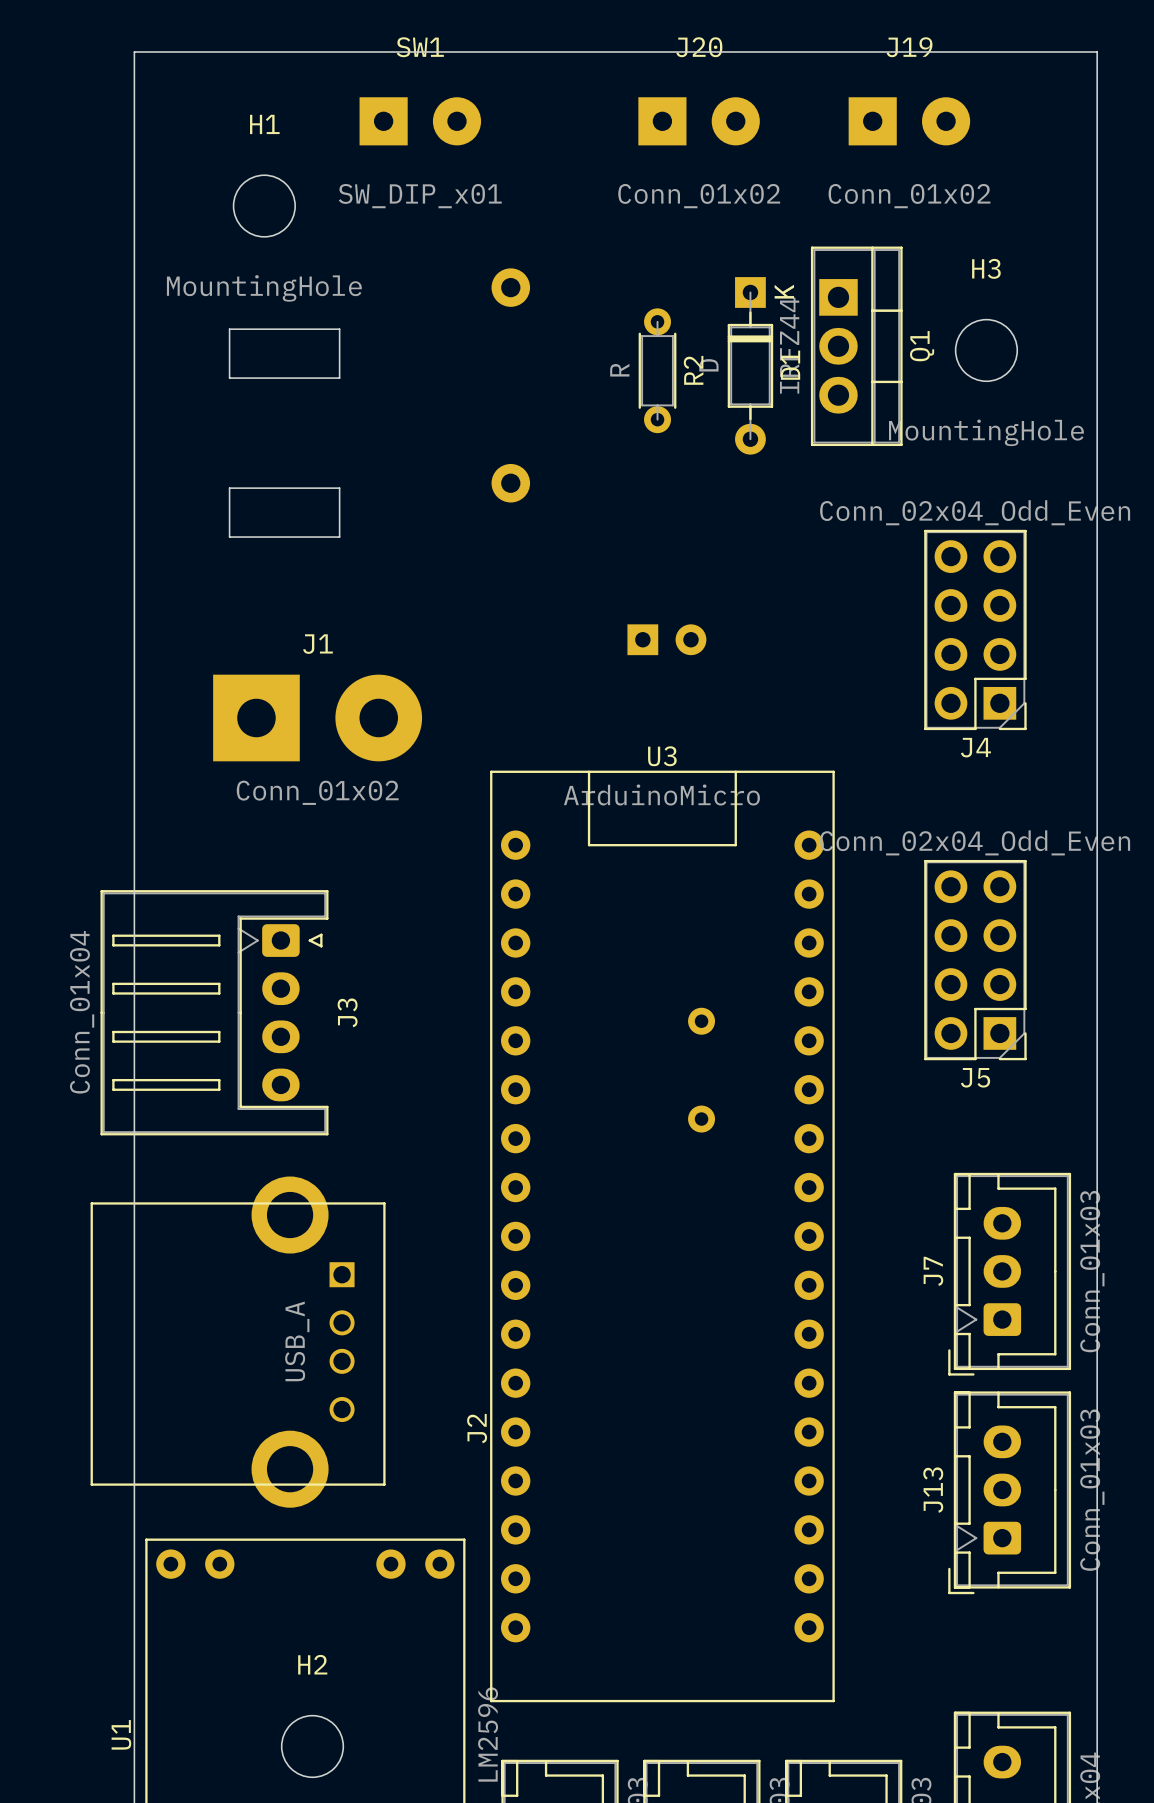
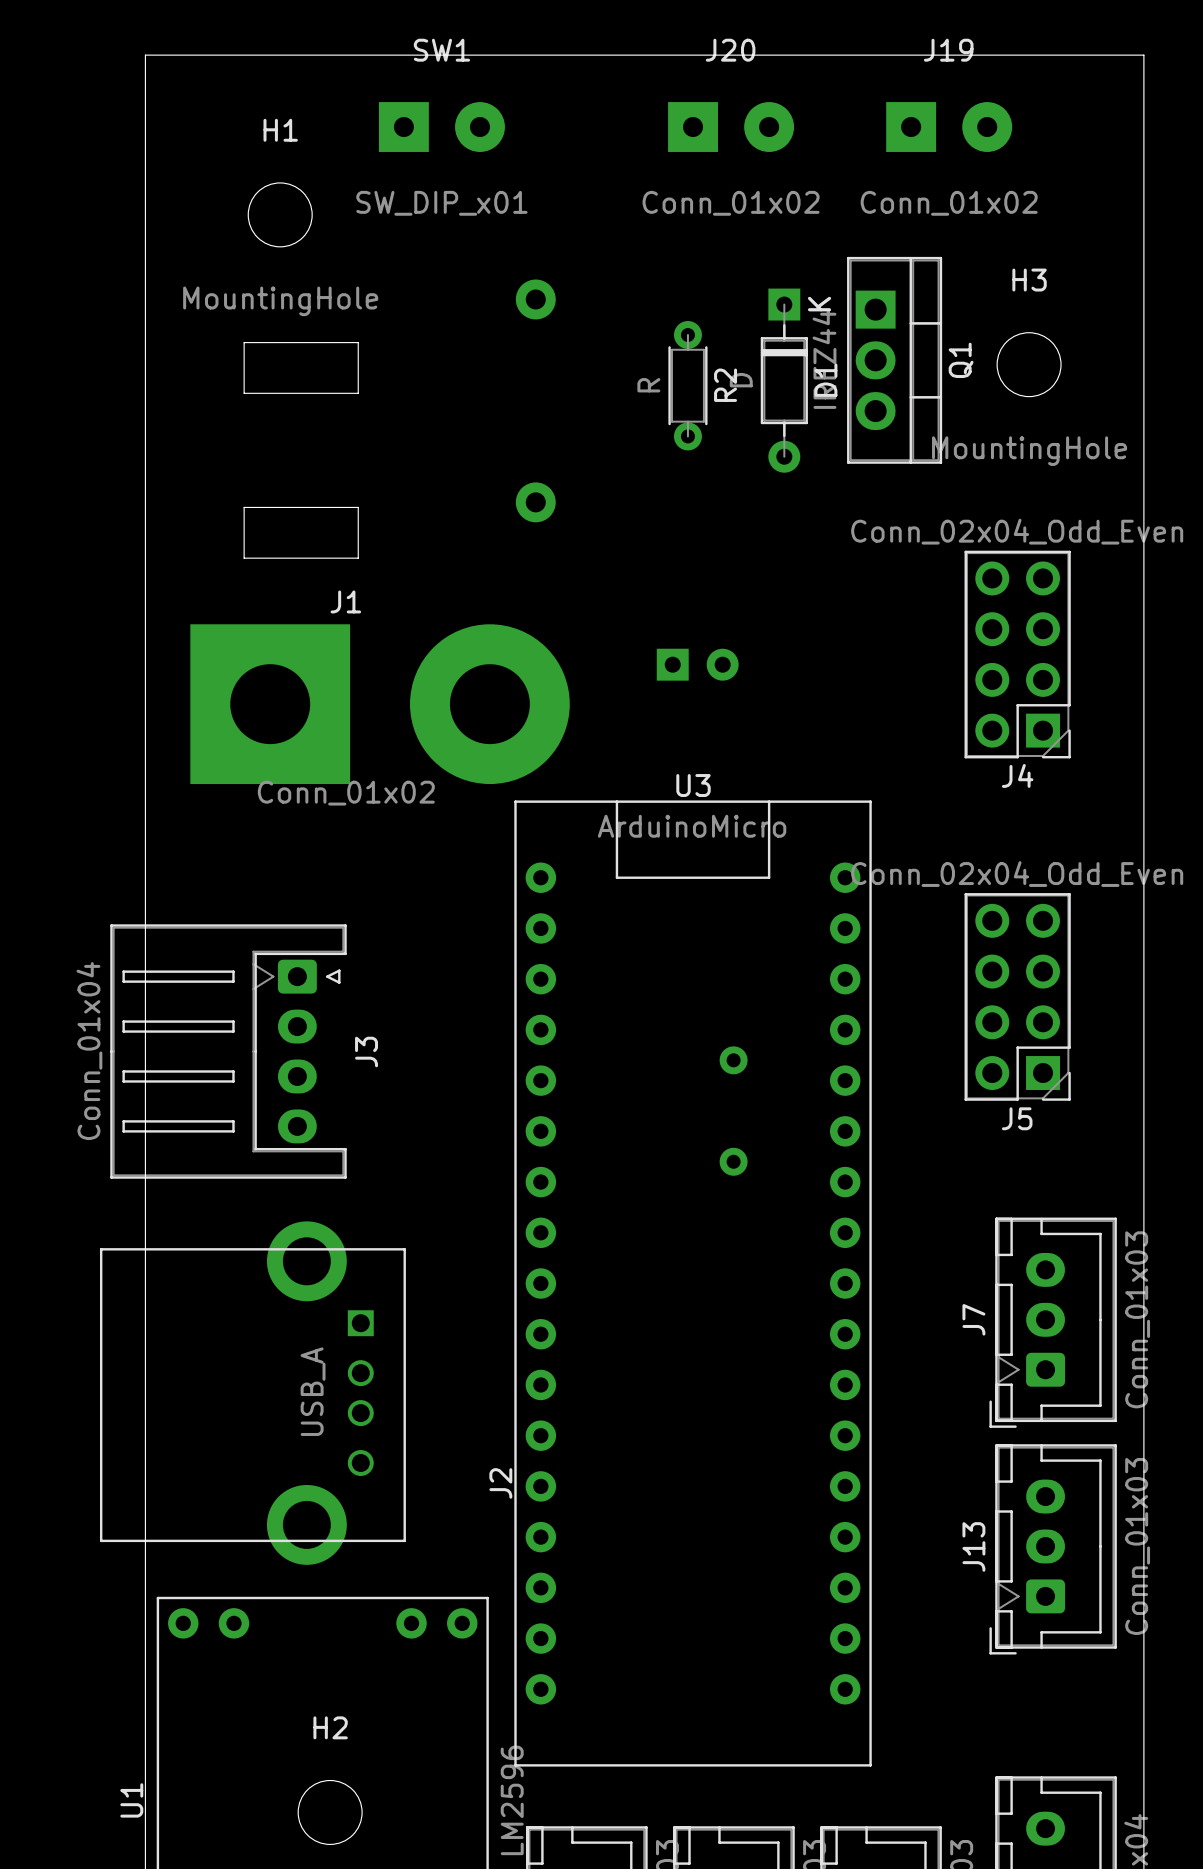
J1 name position: J1 (317, 644) -> J1 (345, 601)
J1 footprint: [213, 674, 423, 762] -> [190, 624, 570, 785]

